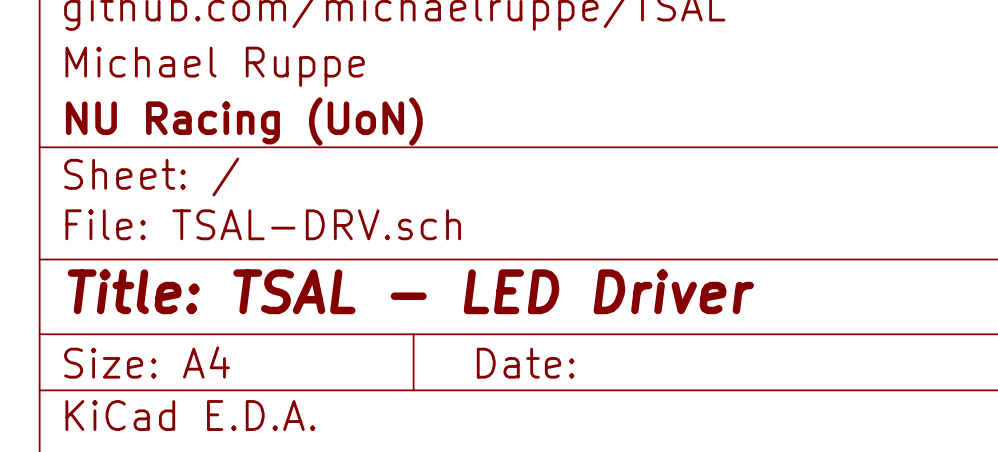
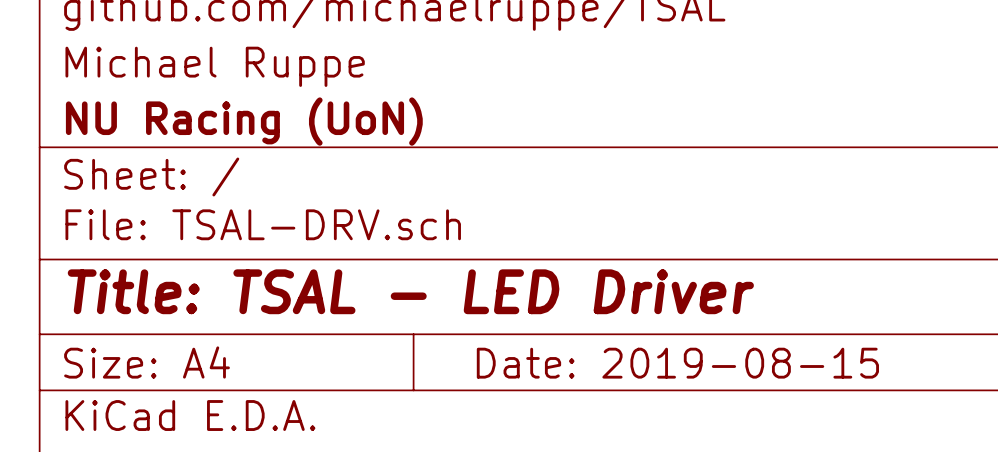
title block: Date: (525, 363) -> Date: 2019-08-15 (677, 363)

